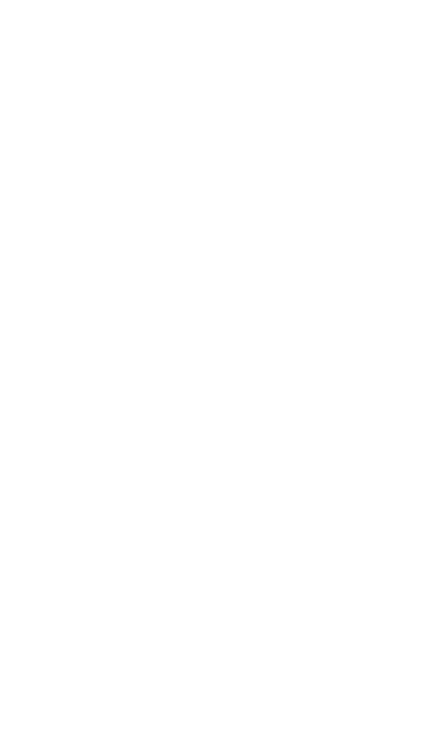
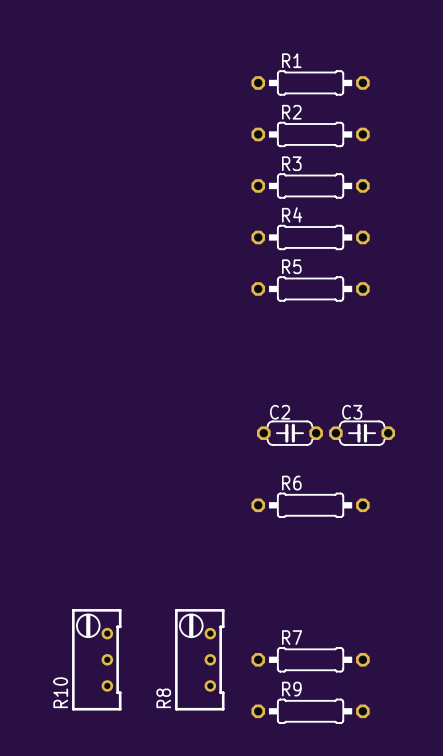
R1: none -> (310, 82)
R2: none -> (310, 134)
R3: none -> (310, 185)
R4: none -> (310, 237)
R5: none -> (310, 288)
C2: none -> (289, 433)
C3: none -> (362, 433)
R6: none -> (310, 505)
R10: none -> (96, 659)
R8: none -> (199, 659)
R7: none -> (310, 659)
R9: none -> (310, 711)

